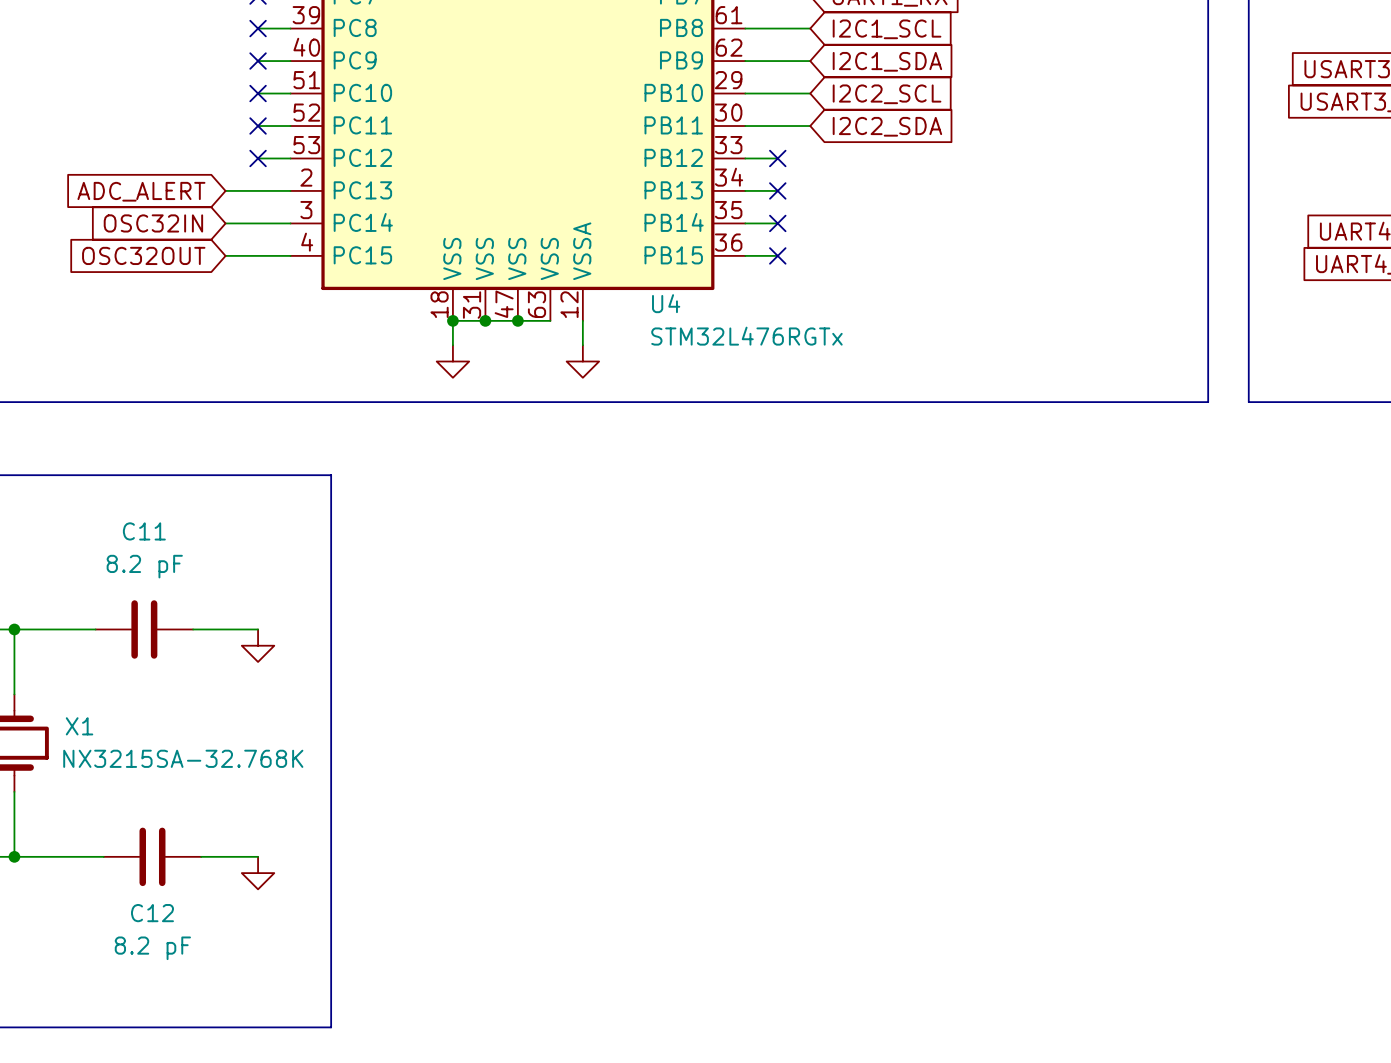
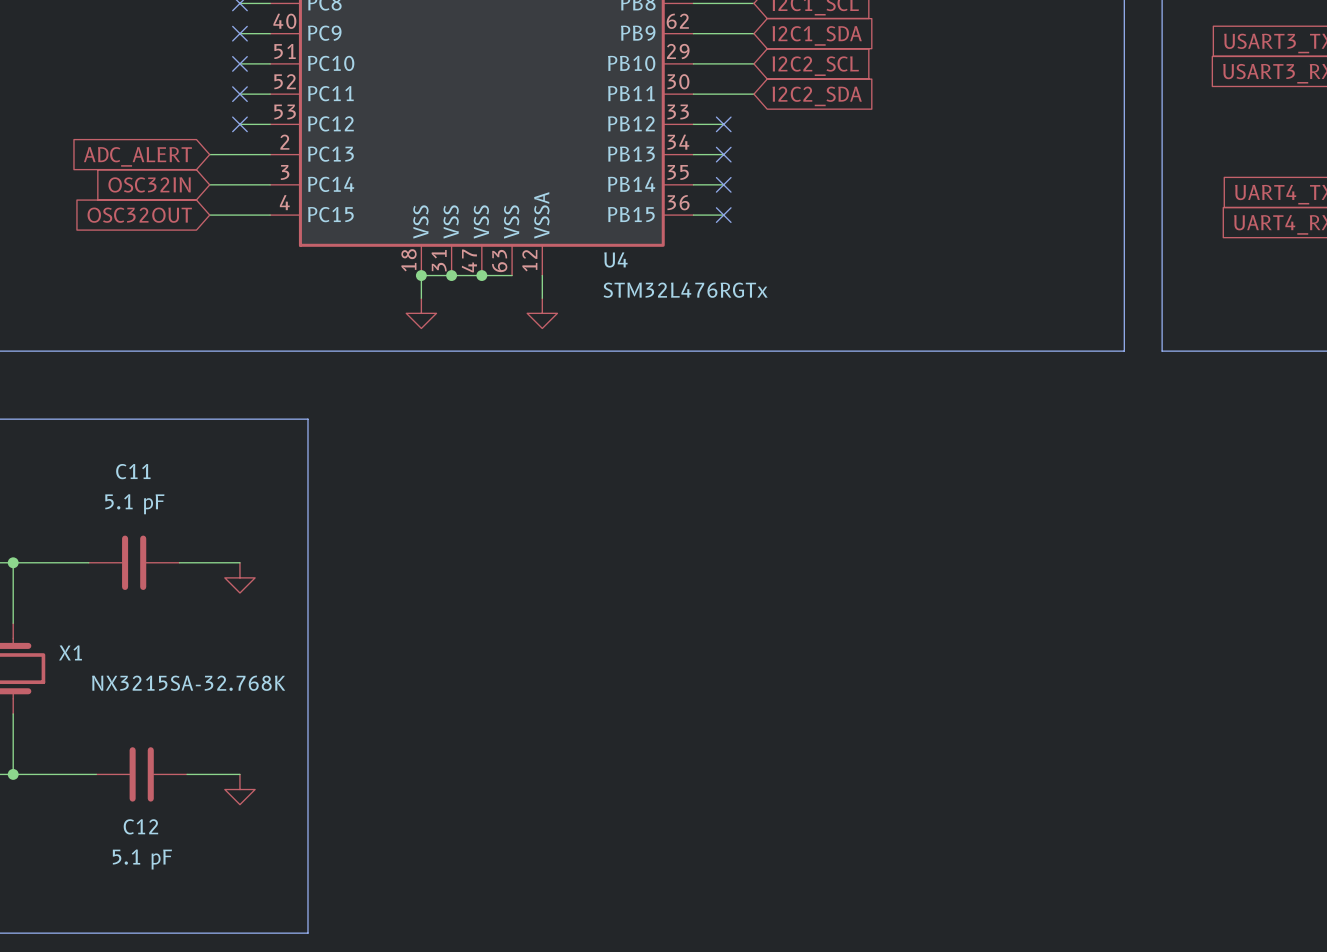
C11 value: 8.2 pF (144, 566) -> 5.1 pF (134, 504)
C12 value: 8.2 pF (152, 948) -> 5.1 pF (142, 859)

